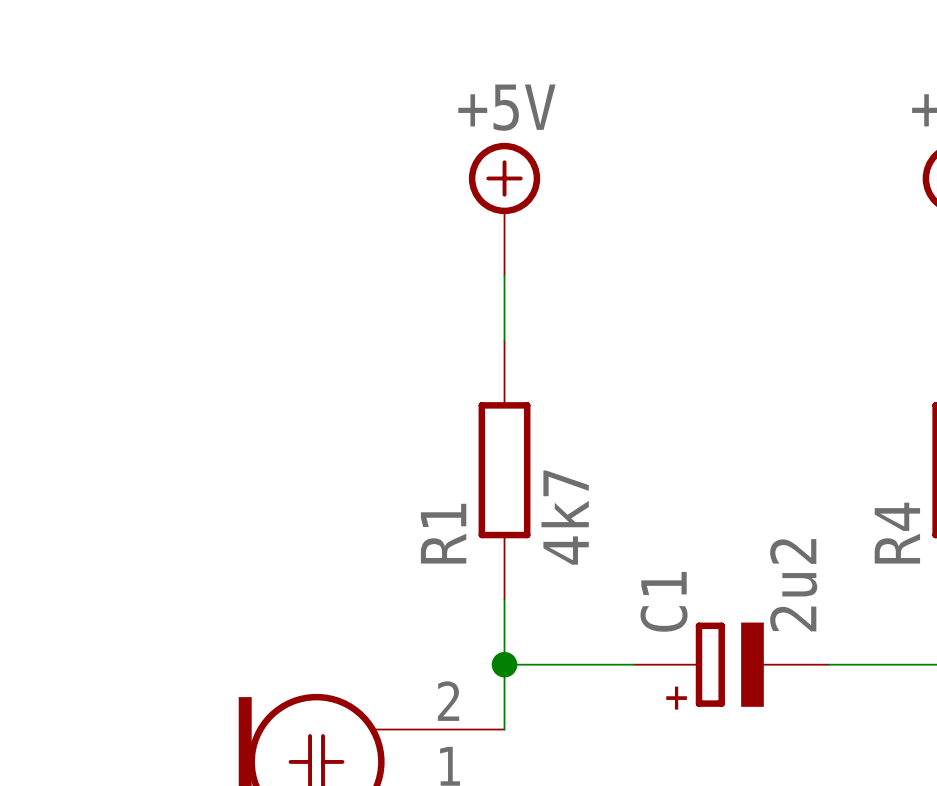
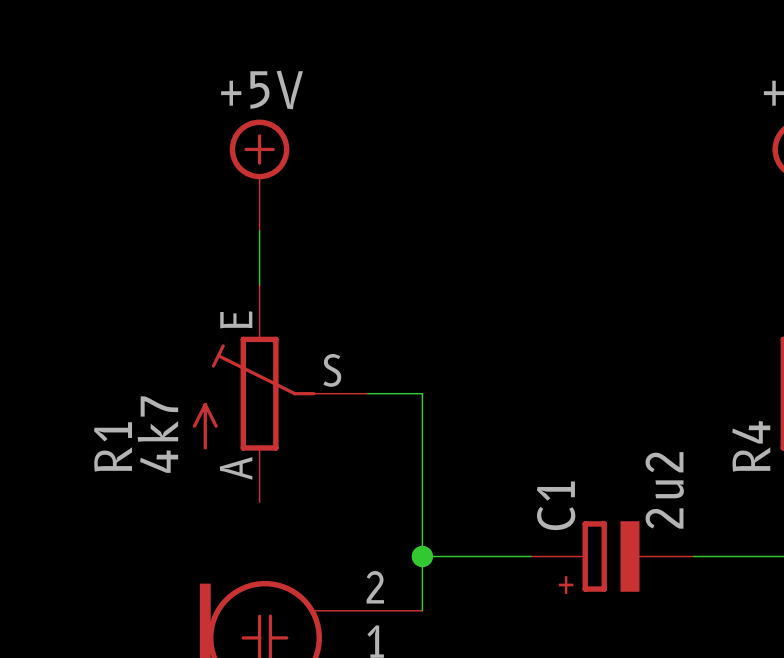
power symbol position: +5V (504, 209) -> +5V (259, 175)
wire: (504, 275) (504, 340) -> (259, 230) (259, 285)
R1 symbol: [478, 340, 531, 600] -> [192, 285, 369, 503]
wire: none -> (368, 393) (422, 393) (422, 502)
R1 value position: 4k7 (565, 517) -> 4k7 (157, 434)
R1 name position: R1 (443, 533) -> R1 (113, 446)

